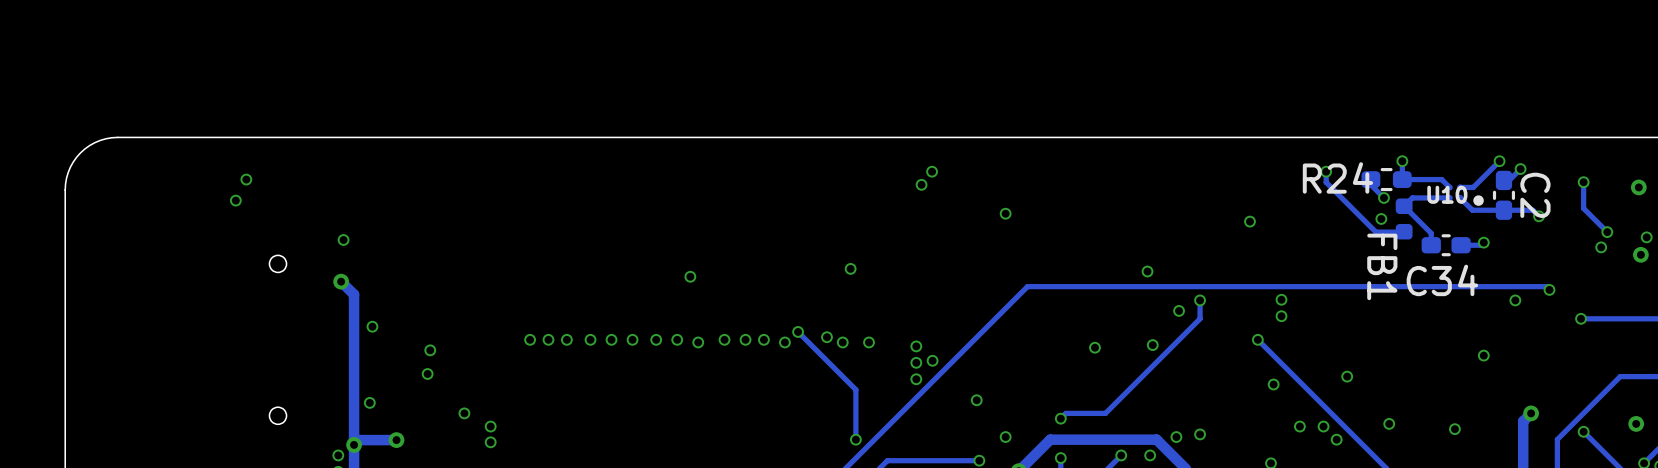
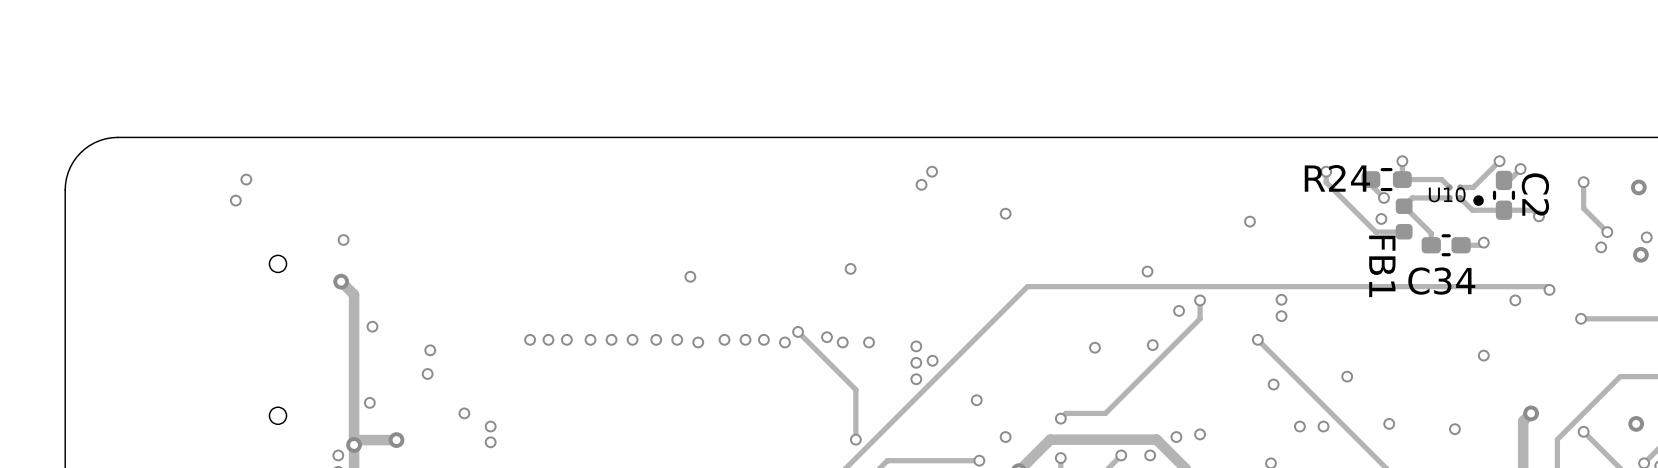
via: (1336, 439) -> none

